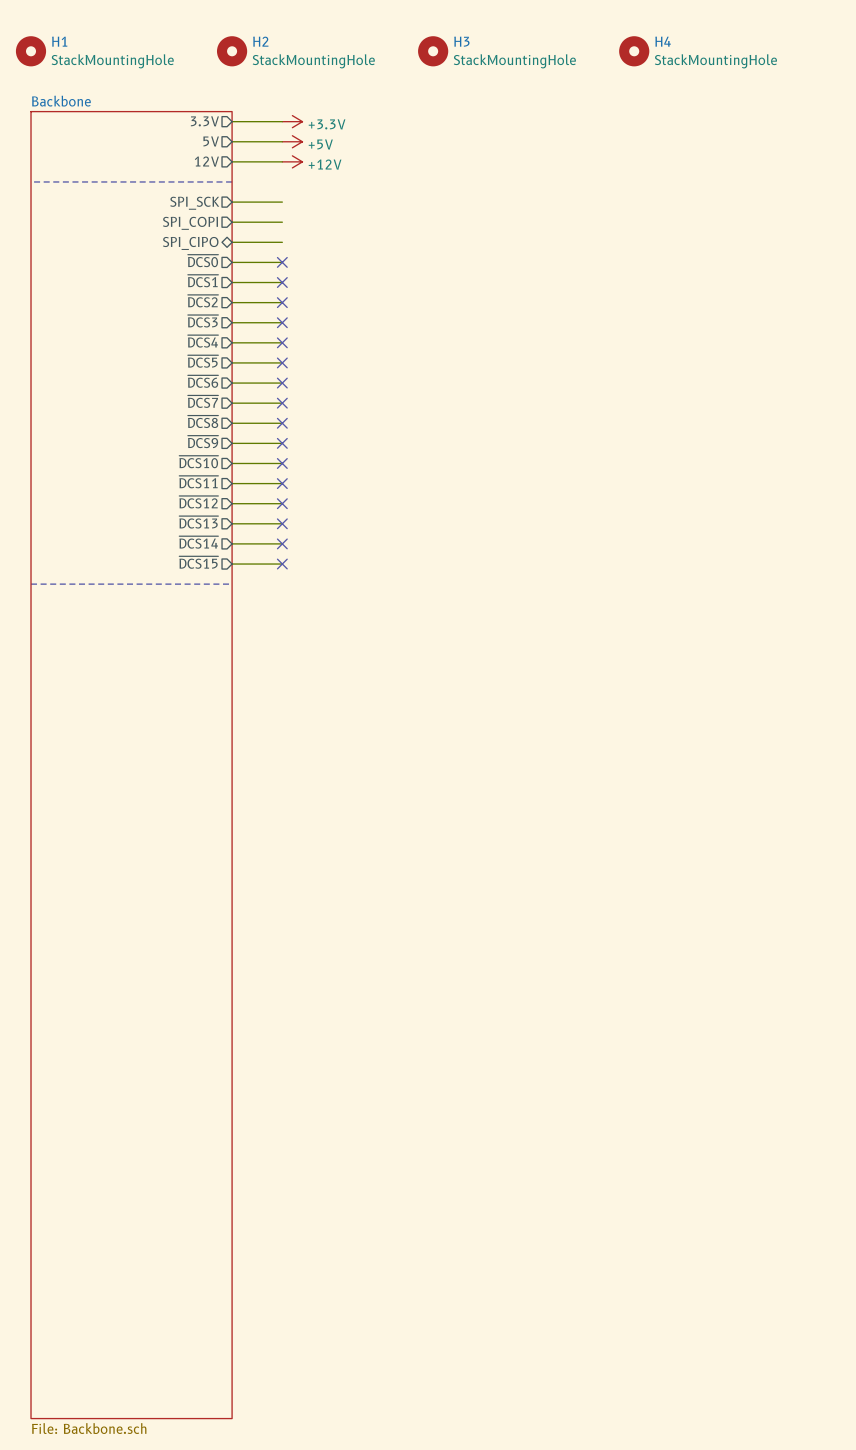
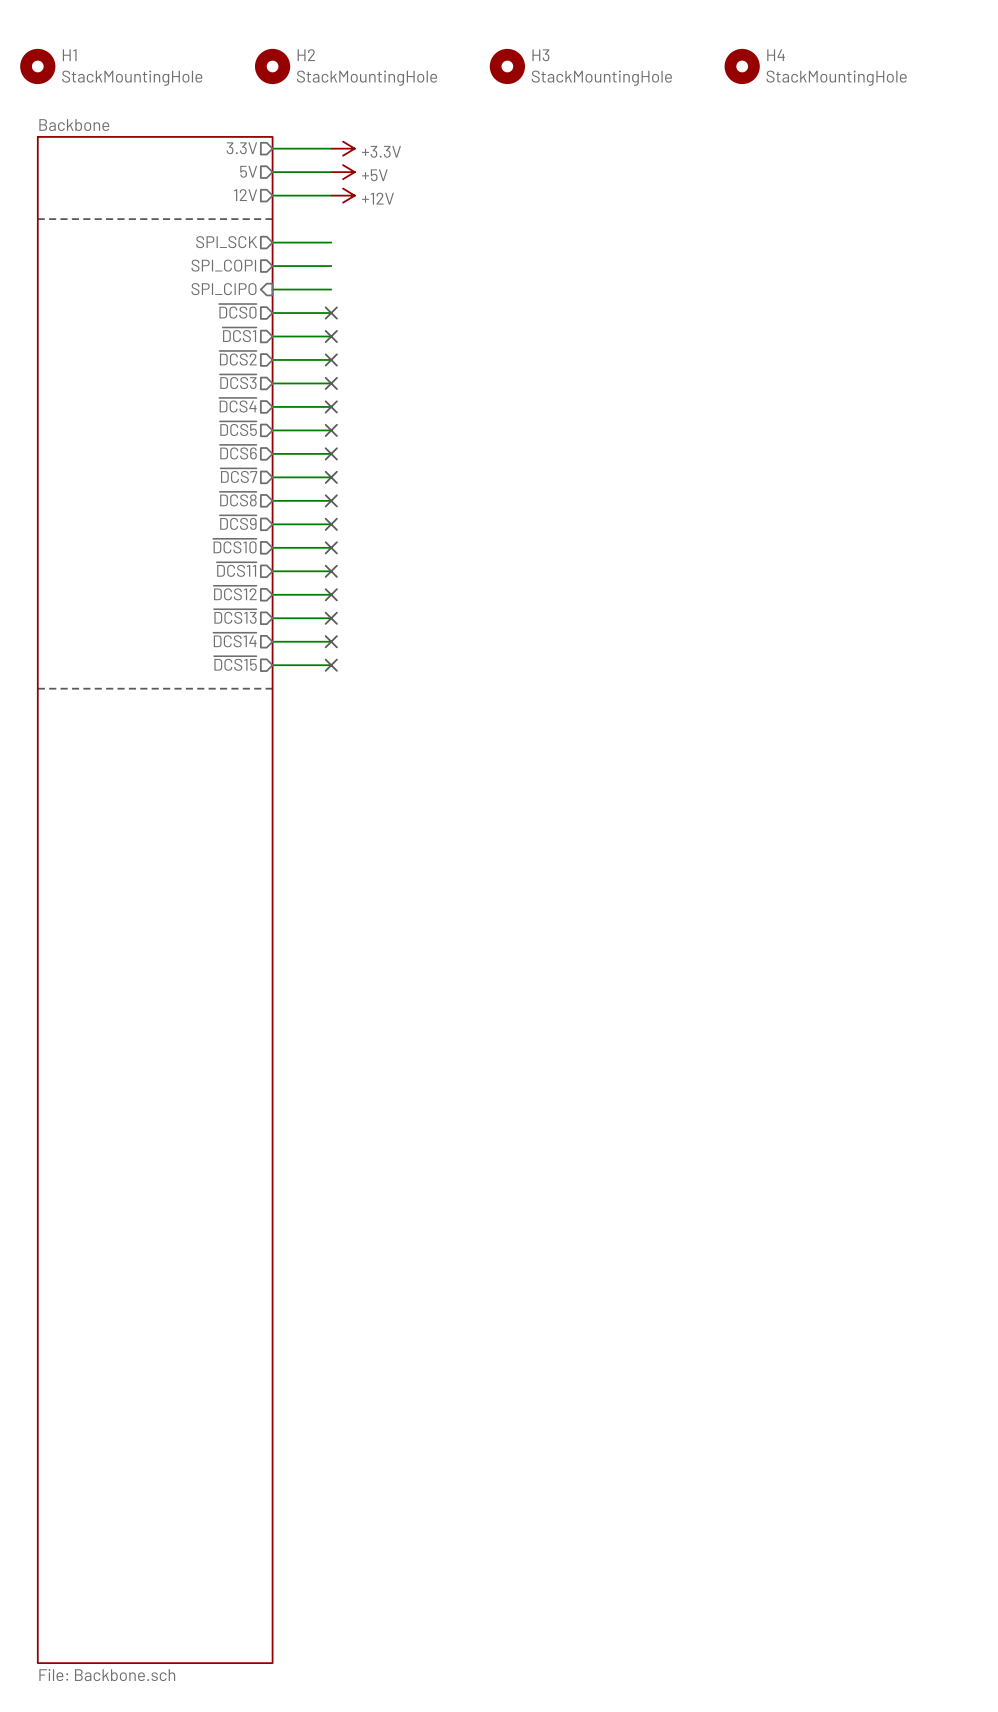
sheet pin shape: bidirectional (190, 243) -> input (223, 289)

